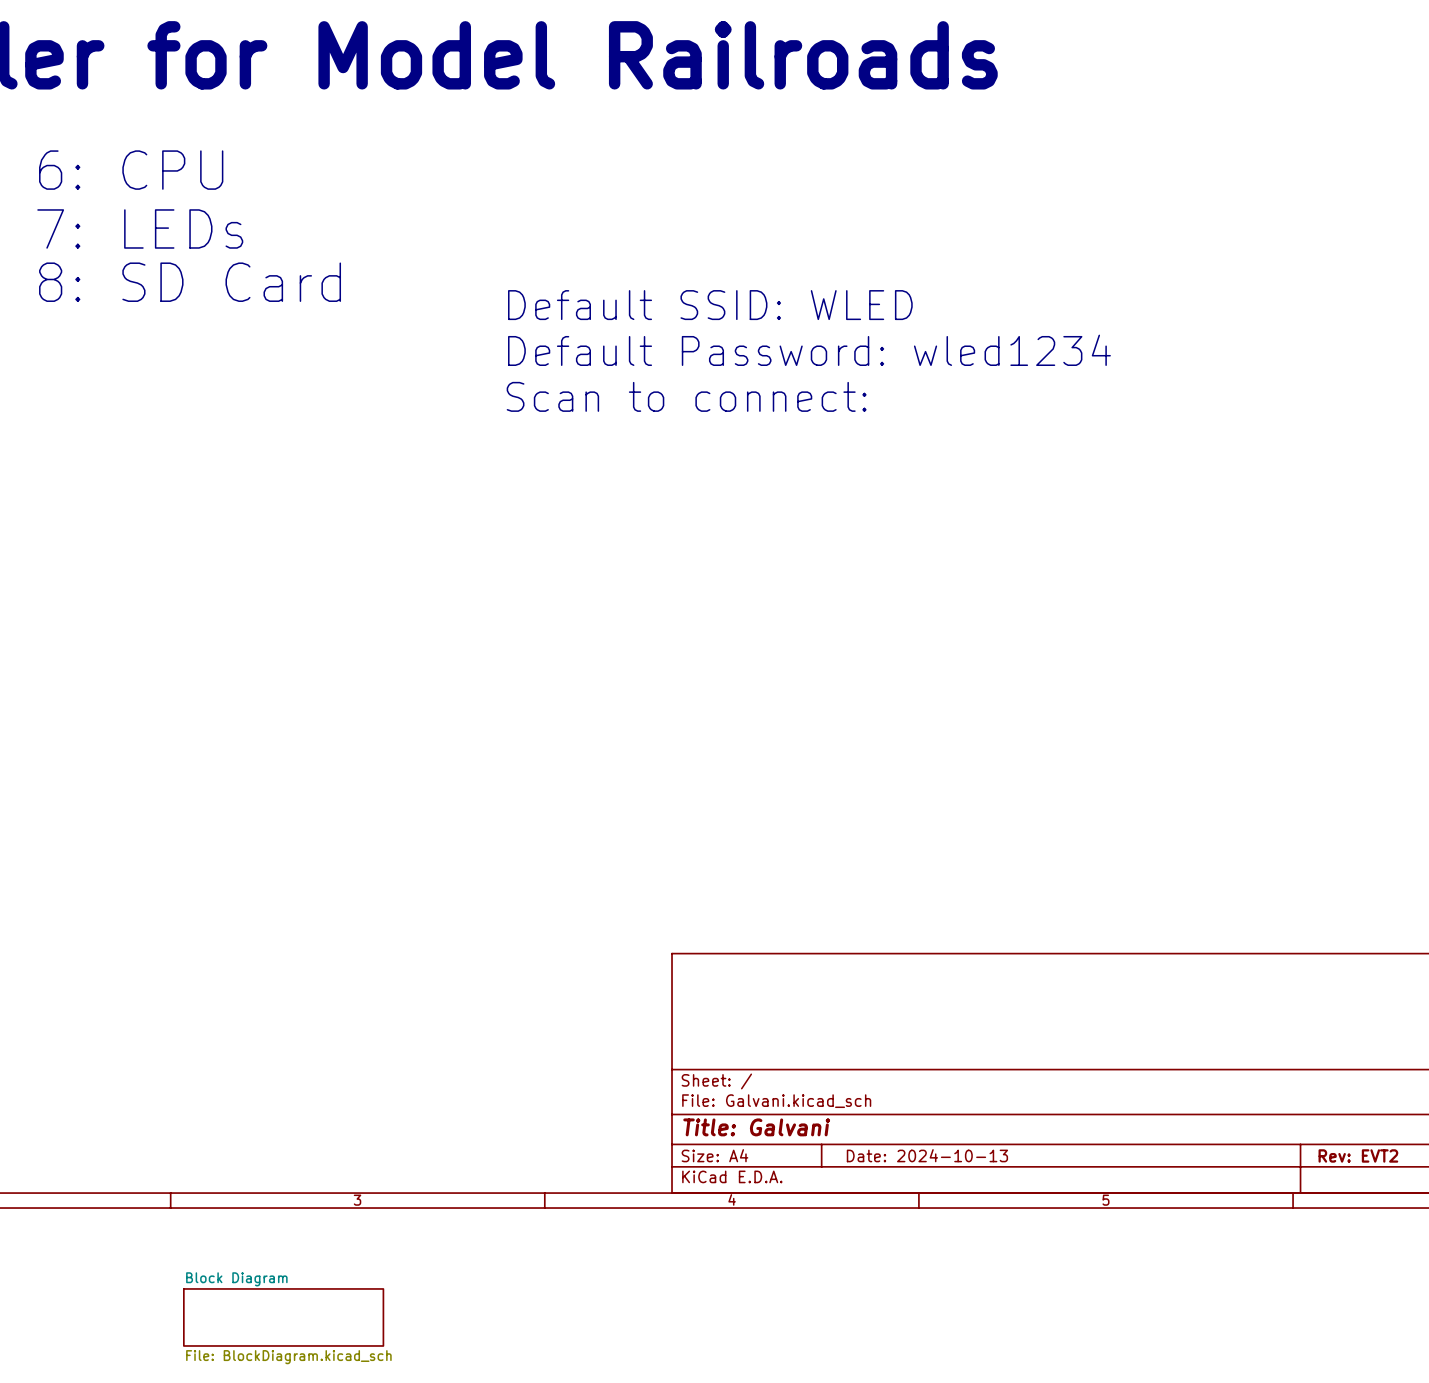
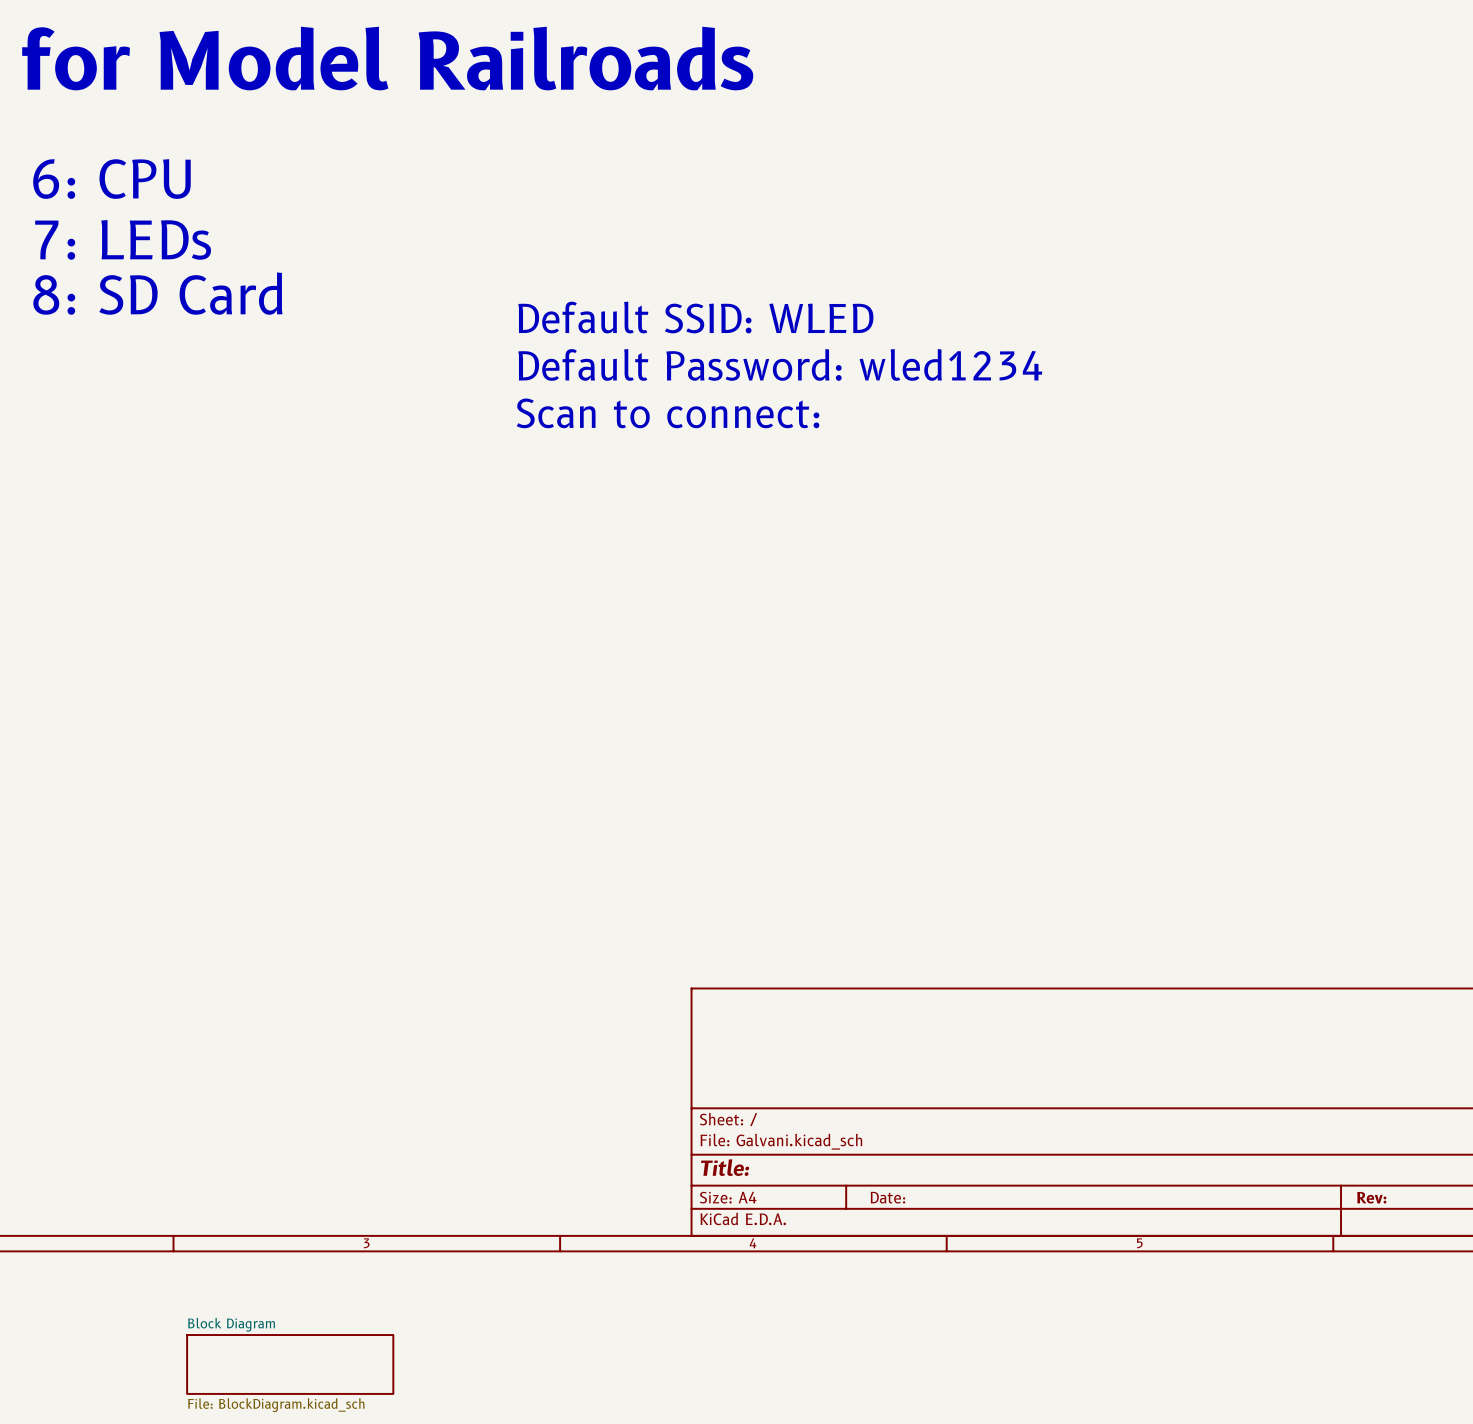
title block: Title: Galvani (756, 1127) -> Title: (725, 1167)
title block: Date: 2024-10-13 (927, 1155) -> Date: (887, 1197)
title block: Rev: EVT2 (1358, 1155) -> Rev: (1371, 1197)

